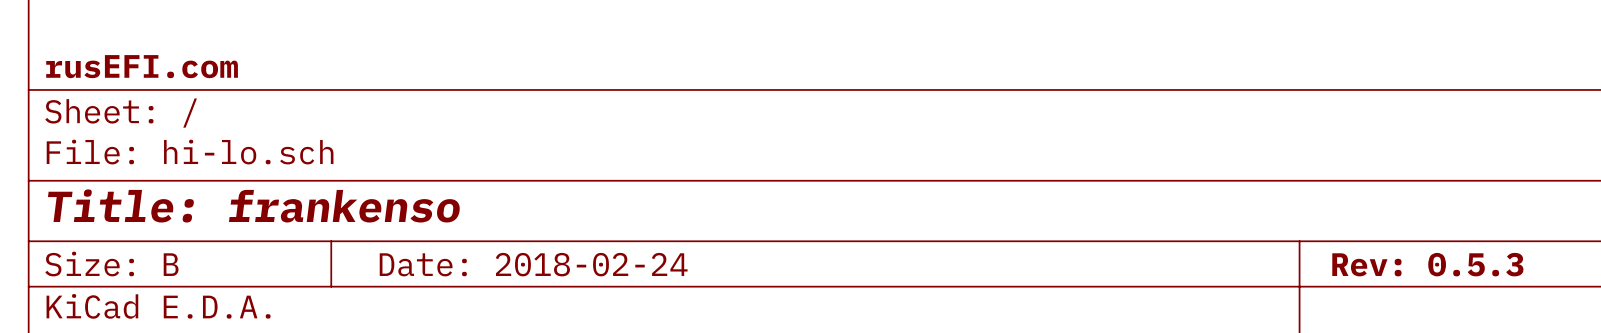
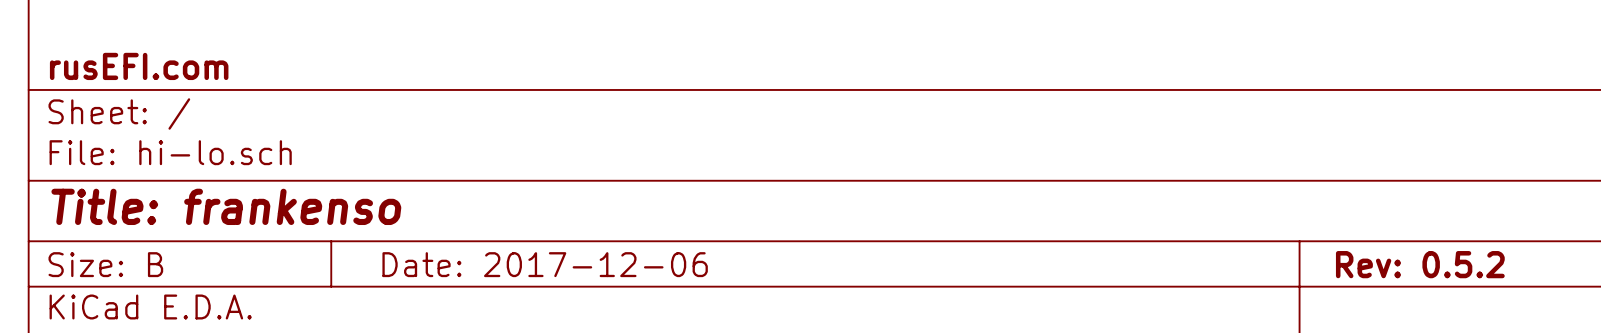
title block: Date: 2018-02-24 (533, 264) -> Date: 2017-12-06 (545, 264)
title block: Rev: 0.5.3 (1427, 264) -> Rev: 0.5.2 (1420, 264)

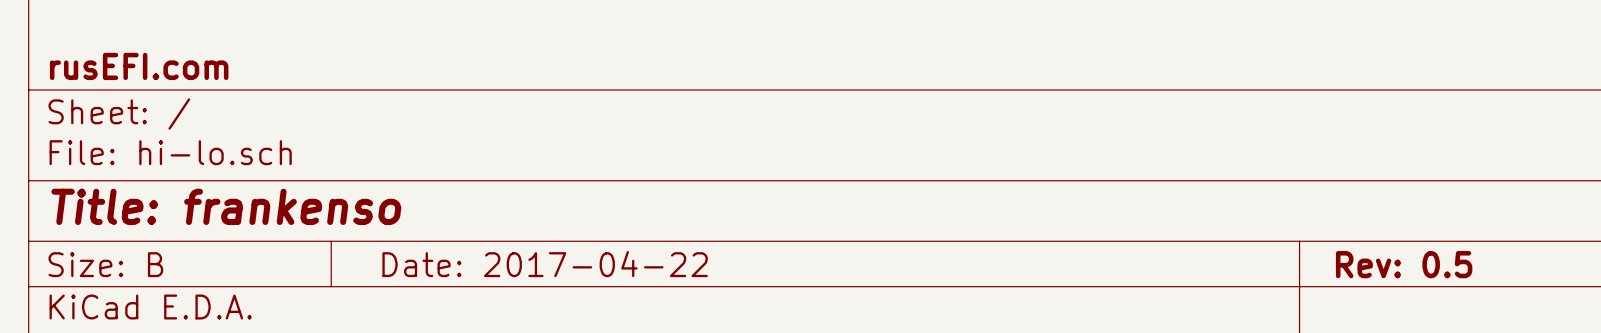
title block: Date: 2017-12-06 (545, 264) -> Date: 2017-04-22 (545, 264)
title block: Rev: 0.5.2 (1420, 264) -> Rev: 0.5 (1404, 264)

